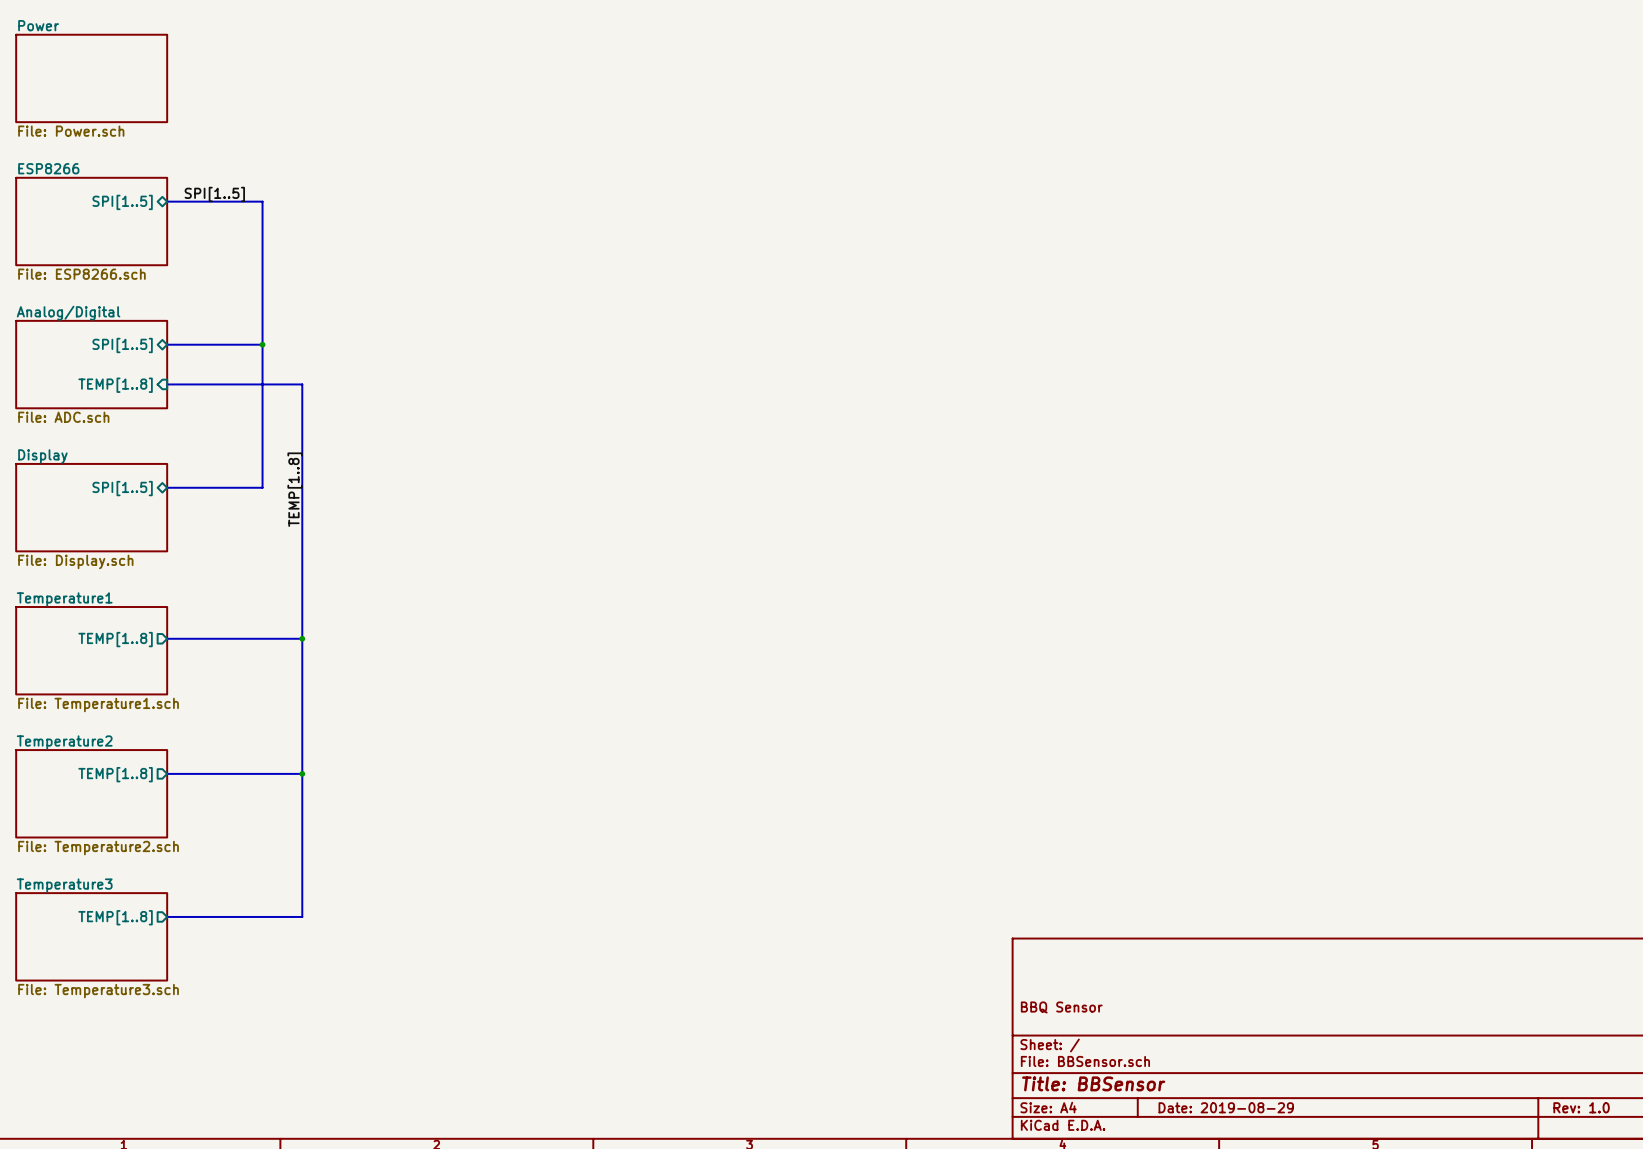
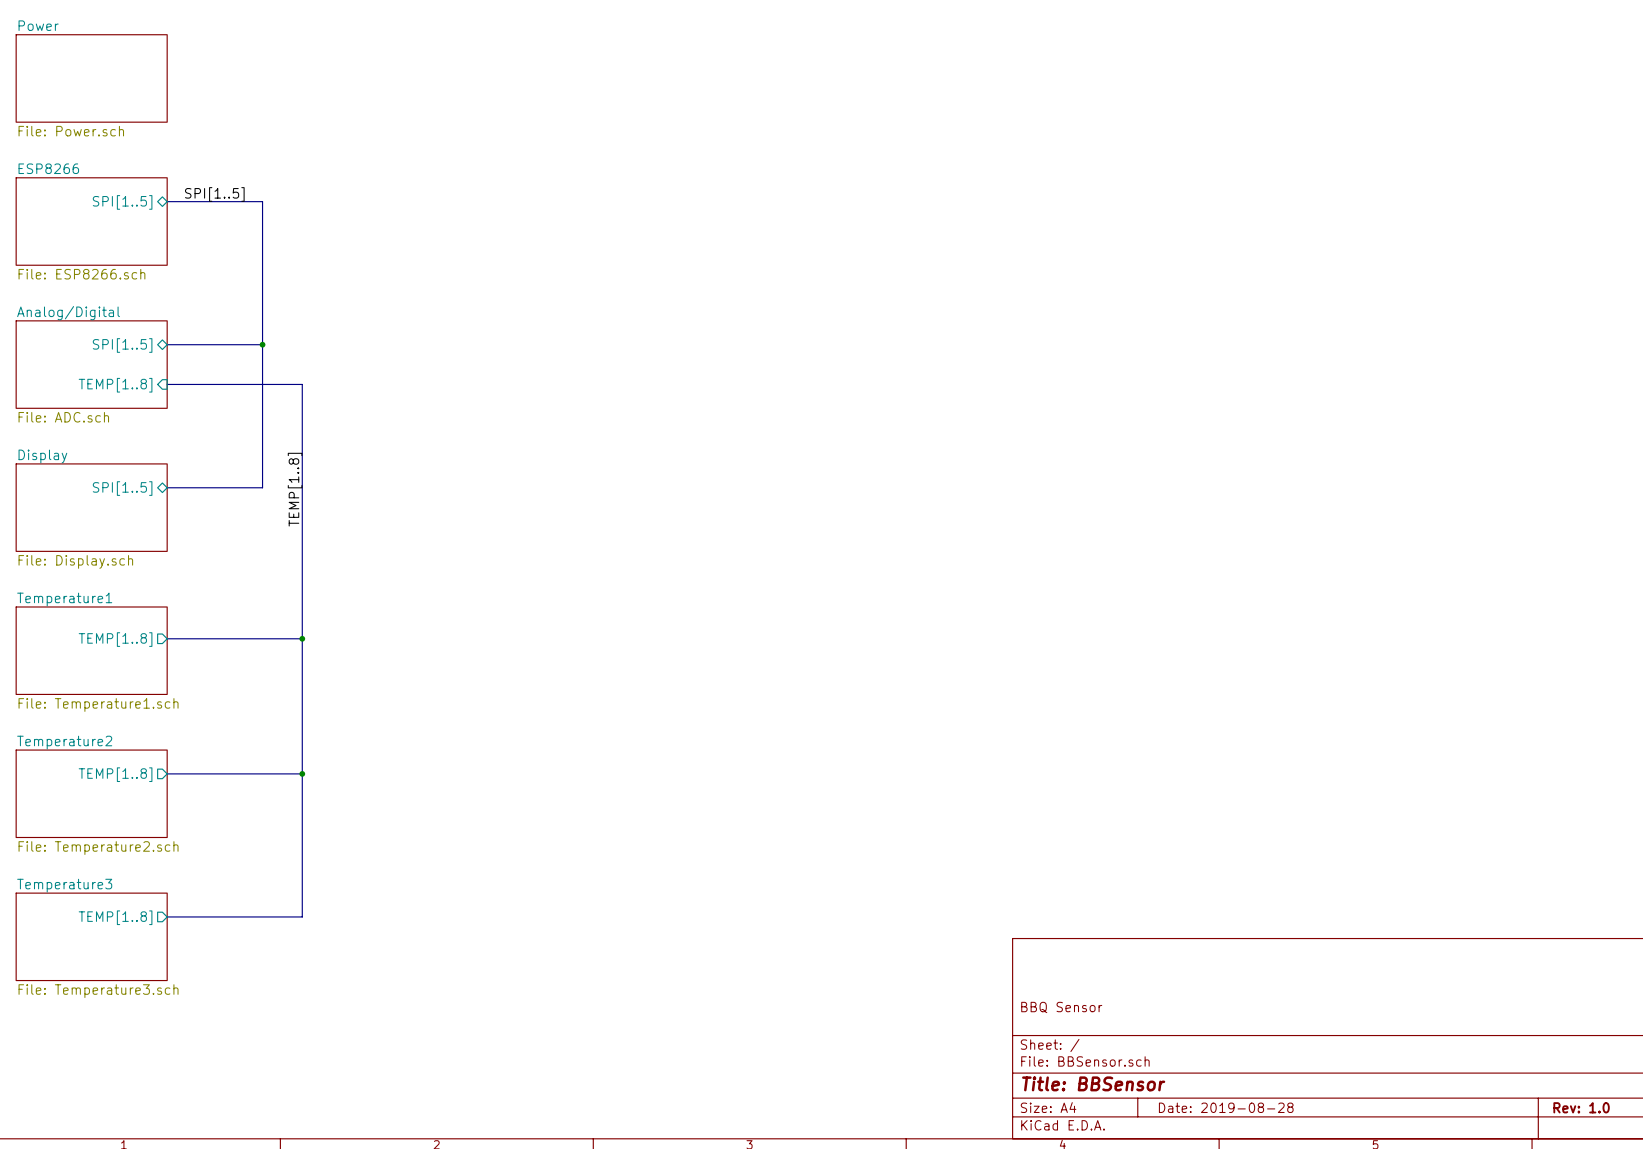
title block: Date: 2019-08-29 (1226, 1107) -> Date: 2019-08-28 (1226, 1107)

